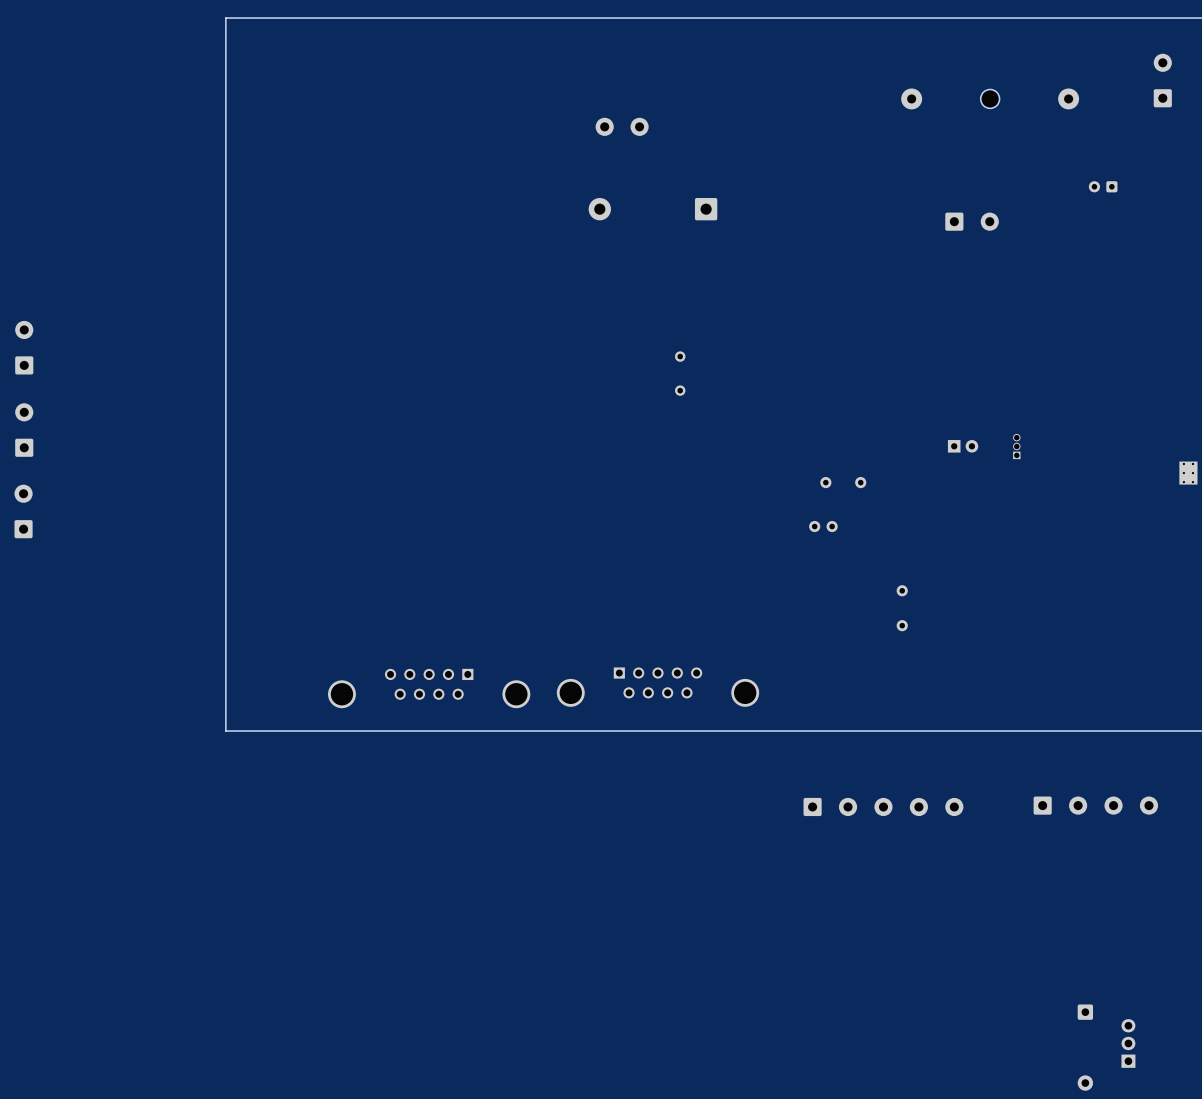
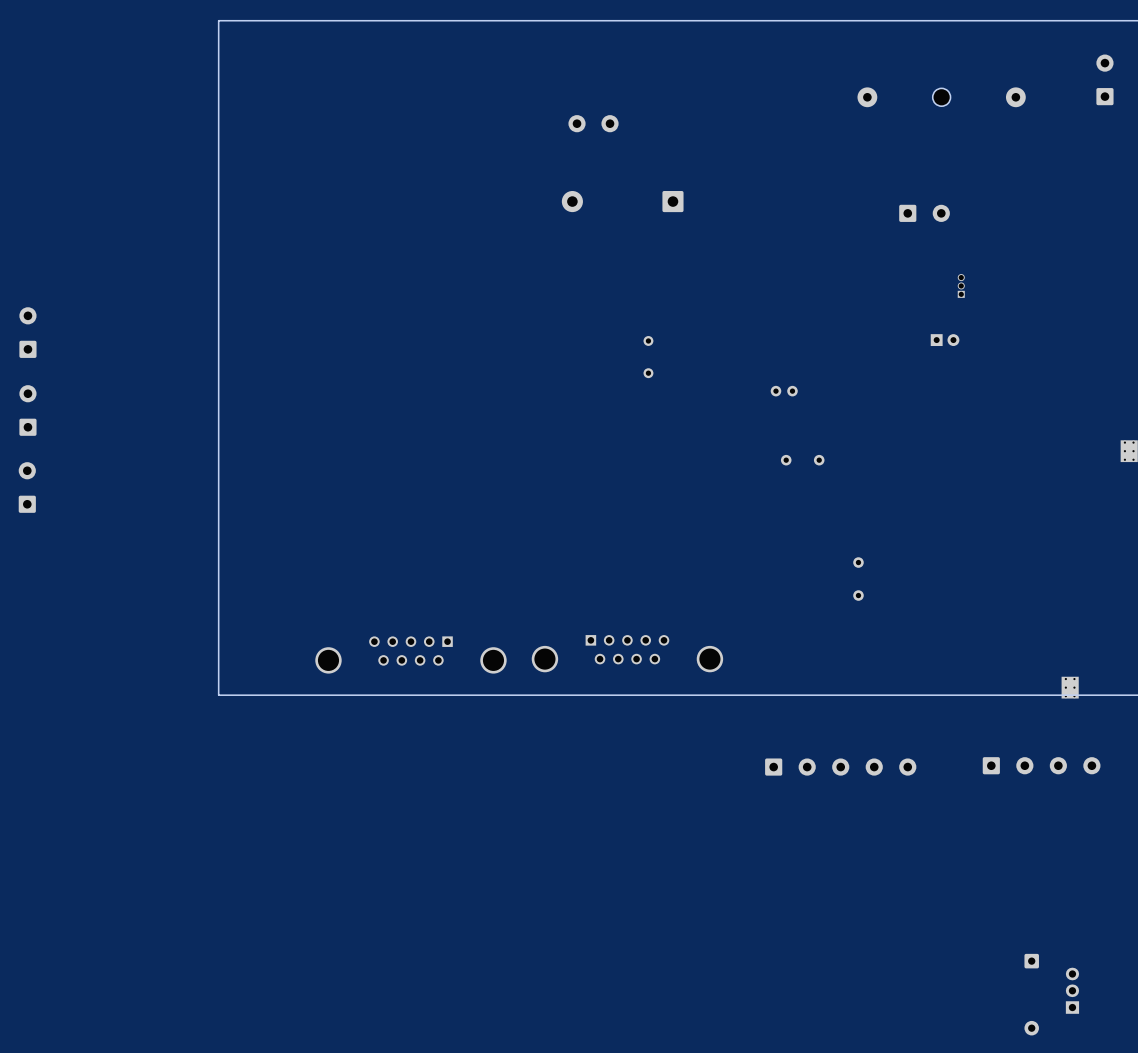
part: (1103, 186) -> none
part position: (963, 446) -> (945, 340)
part position: (1016, 446) -> (961, 285)
part position: (823, 526) -> (784, 391)
part: none -> (1070, 687)

